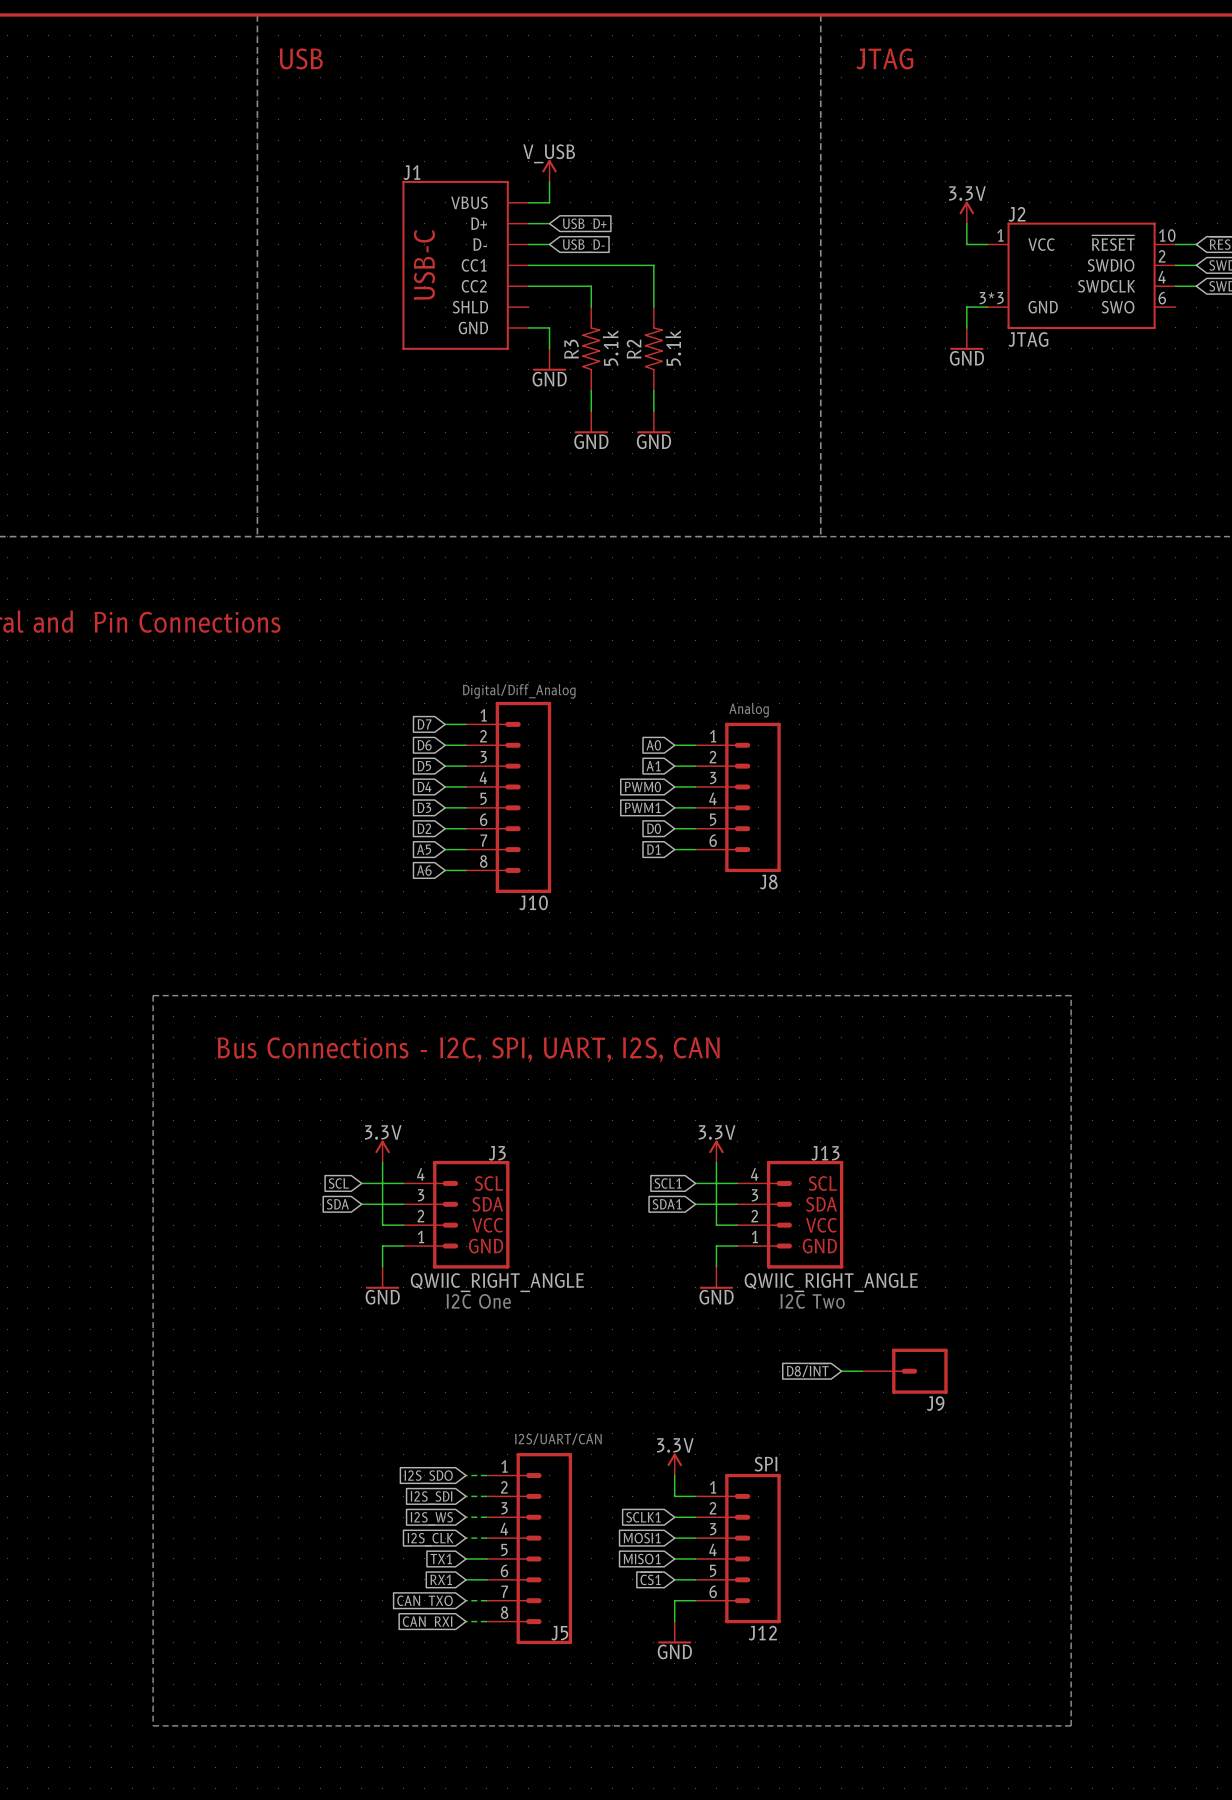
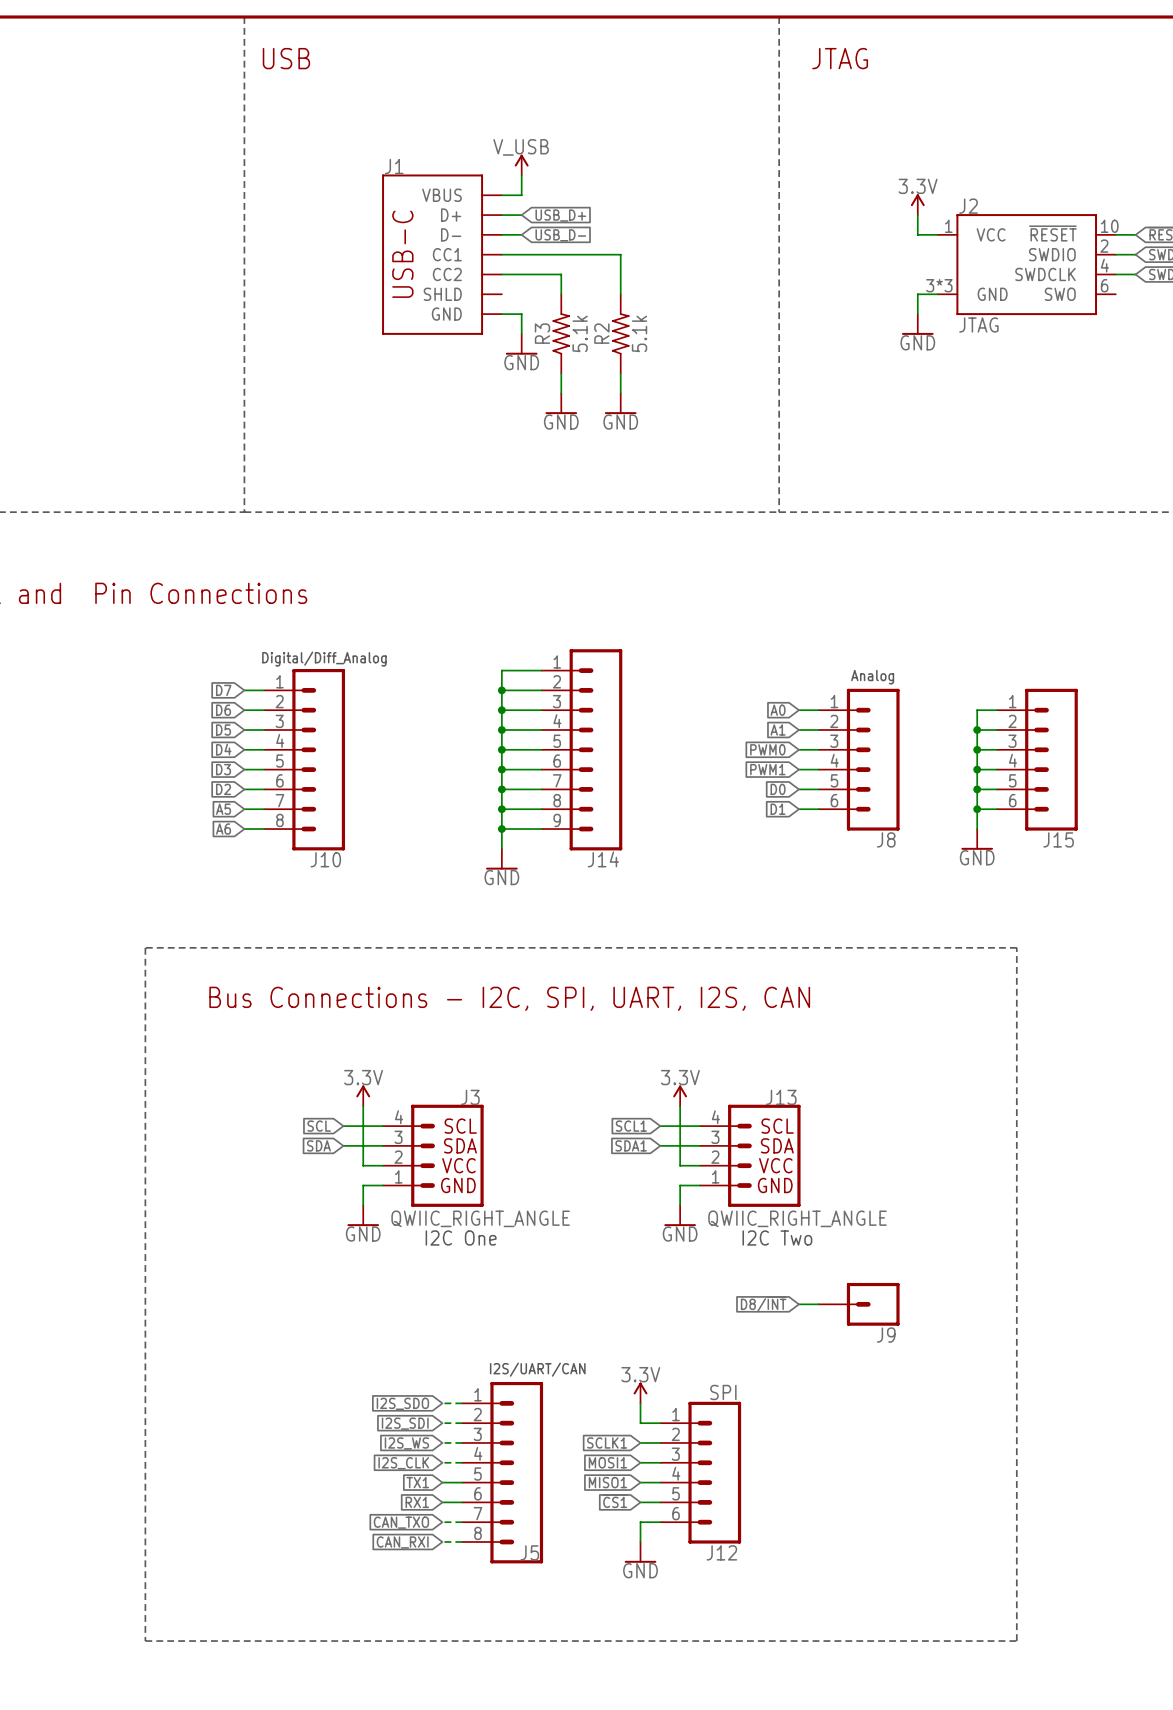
text position: Digital/Diff_Analog (519, 691) -> Digital/Diff_Analog (324, 659)
wire: none -> (541, 670) (501, 670) (501, 848)
text position: Analog (749, 710) -> Analog (872, 677)
global label position: D7 (424, 724) -> D7 (223, 690)
wire: (445, 724) (466, 724) -> (244, 690) (264, 690)
wire: none -> (501, 690) (541, 690)
junction: none -> (501, 690)
global label position: D6 (424, 745) -> D6 (223, 710)
wire: (445, 745) (466, 745) -> (244, 710) (264, 710)
wire: none -> (501, 710) (541, 710)
junction: none -> (501, 710)
global label position: A0 (653, 745) -> A0 (778, 710)
wire: (674, 745) (695, 745) -> (798, 710) (818, 710)
wire: none -> (997, 710) (977, 710) (977, 829)
global label position: D5 (424, 766) -> D5 (223, 730)
wire: (445, 766) (466, 766) -> (244, 730) (264, 730)
wire: none -> (501, 730) (541, 730)
junction: none -> (501, 730)
global label position: A1 (653, 766) -> A1 (778, 730)
wire: (674, 766) (695, 766) -> (798, 730) (818, 730)
wire: none -> (977, 730) (997, 730)
junction: none -> (977, 730)
global label position: D4 (424, 786) -> D4 (223, 749)
wire: (445, 786) (466, 786) -> (244, 749) (264, 749)
wire: none -> (501, 749) (541, 749)
junction: none -> (501, 749)
J14: none -> (581, 749)
wire: (674, 786) (695, 786) -> (798, 749) (818, 749)
wire: none -> (977, 749) (997, 749)
junction: none -> (977, 749)
global label position: PWM0 (642, 787) -> PWM0 (767, 749)
J10 position: (508, 797) -> (304, 759)
J8 position: (738, 797) -> (859, 759)
J15: none -> (1037, 759)
global label position: D3 (424, 807) -> D3 (223, 769)
wire: (445, 807) (466, 807) -> (244, 769) (264, 769)
wire: none -> (501, 769) (541, 769)
junction: none -> (501, 769)
global label position: PWM1 (642, 807) -> PWM1 (767, 769)
wire: (674, 807) (695, 807) -> (798, 769) (818, 769)
wire: none -> (977, 769) (997, 769)
junction: none -> (977, 769)
global label position: D2 (424, 828) -> D2 (223, 789)
wire: (445, 828) (466, 828) -> (244, 789) (264, 789)
wire: none -> (501, 789) (541, 789)
junction: none -> (501, 789)
global label position: D0 (654, 828) -> D0 (778, 789)
wire: (674, 828) (695, 828) -> (798, 789) (818, 789)
wire: none -> (977, 789) (997, 789)
junction: none -> (977, 789)
global label position: A5 (424, 849) -> A5 (223, 809)
wire: (445, 849) (466, 849) -> (244, 809) (264, 809)
wire: none -> (501, 809) (541, 809)
junction: none -> (501, 809)
global label position: D1 (653, 849) -> D1 (778, 809)
wire: (674, 849) (695, 849) -> (798, 809) (818, 809)
wire: none -> (977, 809) (997, 809)
junction: none -> (977, 809)
global label position: A6 (424, 870) -> A6 (223, 829)
wire: (445, 870) (466, 870) -> (244, 829) (264, 829)
wire: none -> (501, 829) (541, 829)
junction: none -> (501, 829)
power symbol: none -> GND (977, 839)
power symbol: none -> GND (501, 859)

